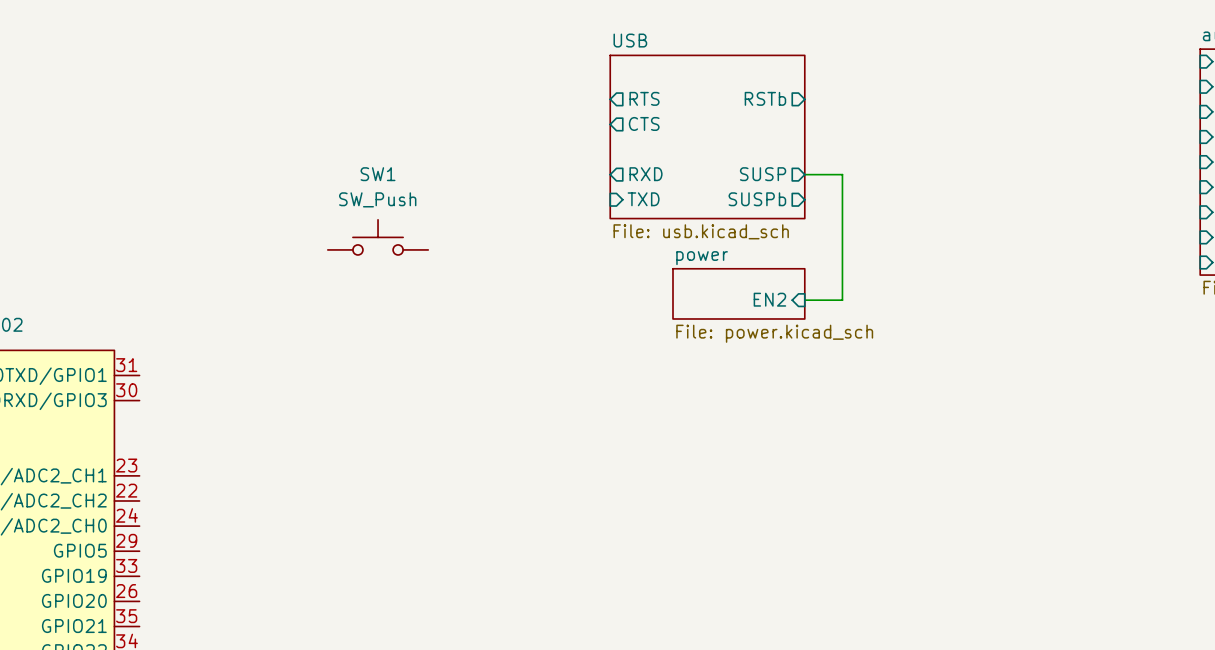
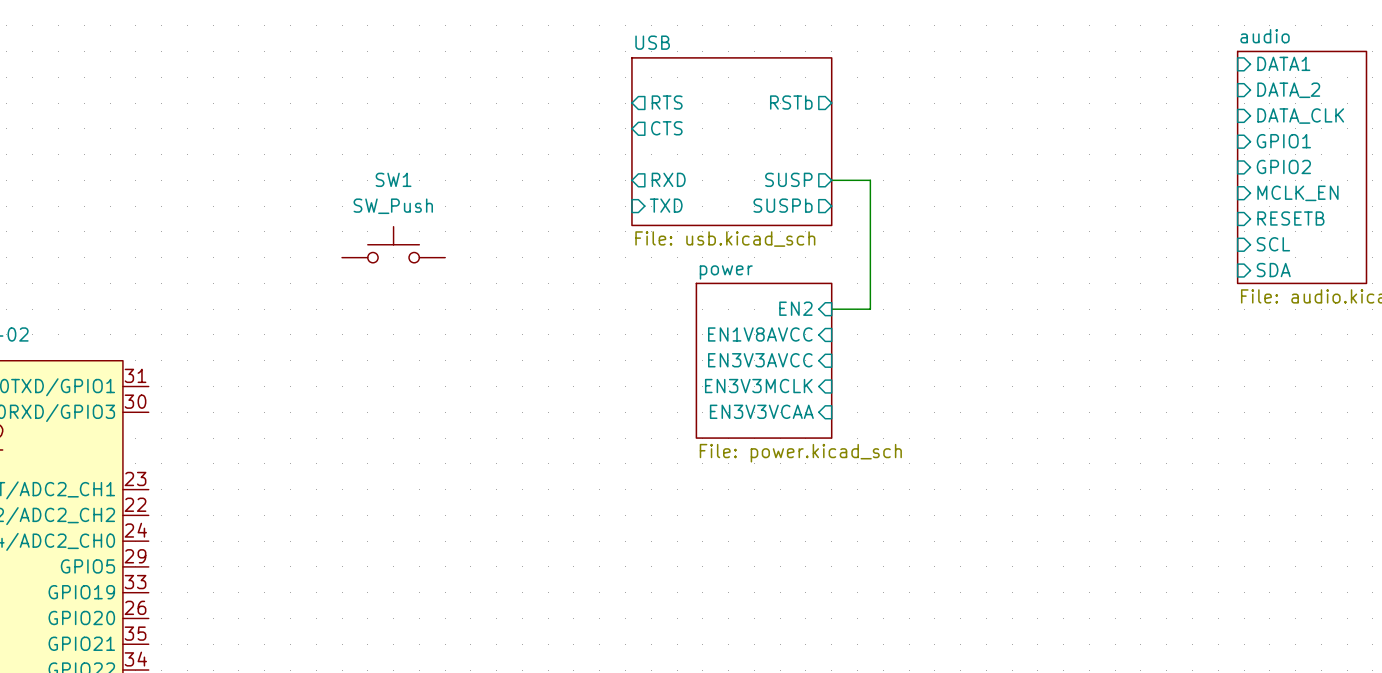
sheet power: File: power.kicad_sch (738, 293) -> none
sheet pin: none -> EN1V8AVCC (760, 334)
sheet pin: none -> EN3V3AVCC (760, 360)
sheet power: none -> File: power.kicad_sch (764, 360)
sheet pin: none -> EN3V3MCLK (758, 386)
sheet pin: none -> EN3V3VCAA (761, 411)

